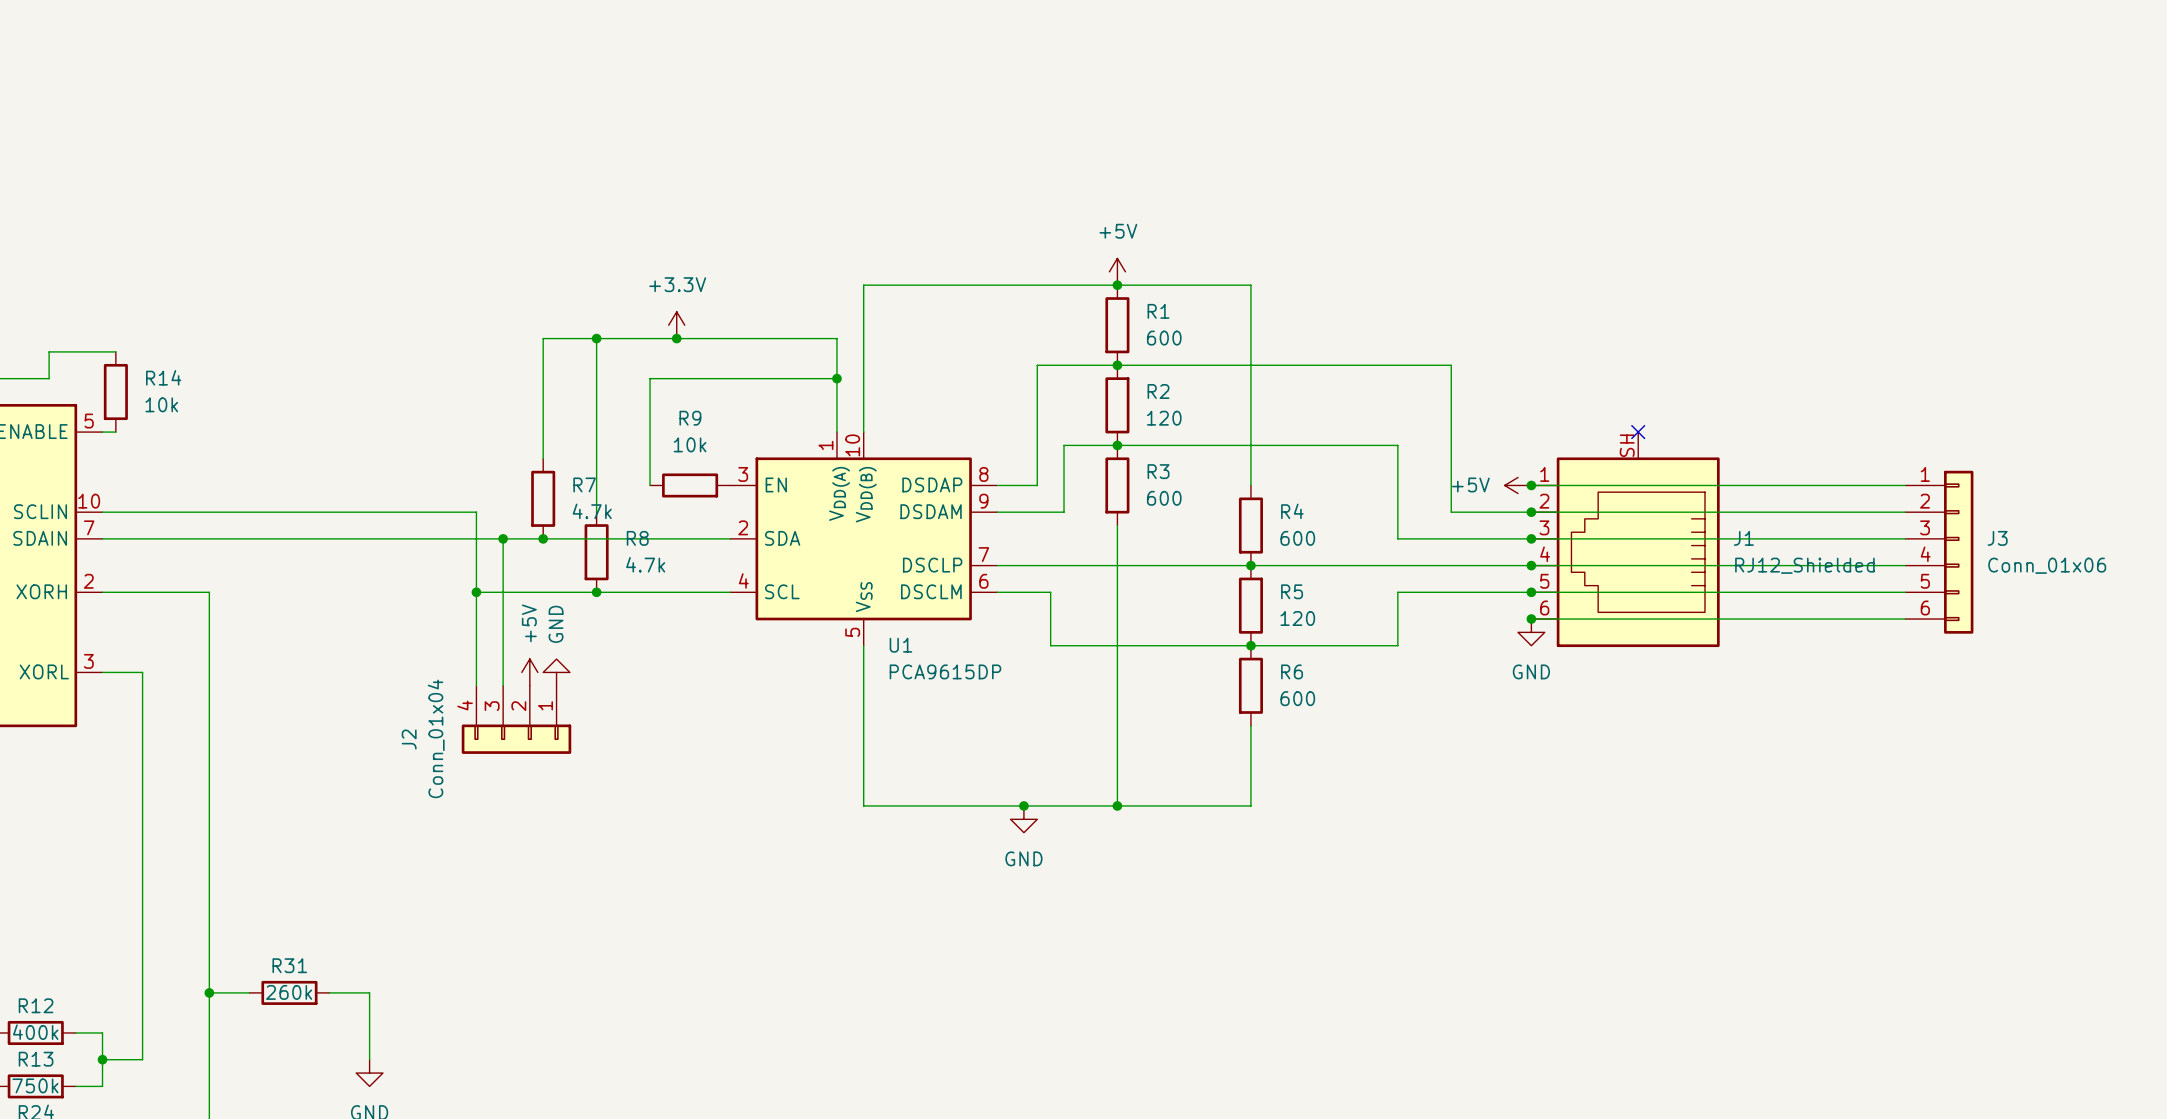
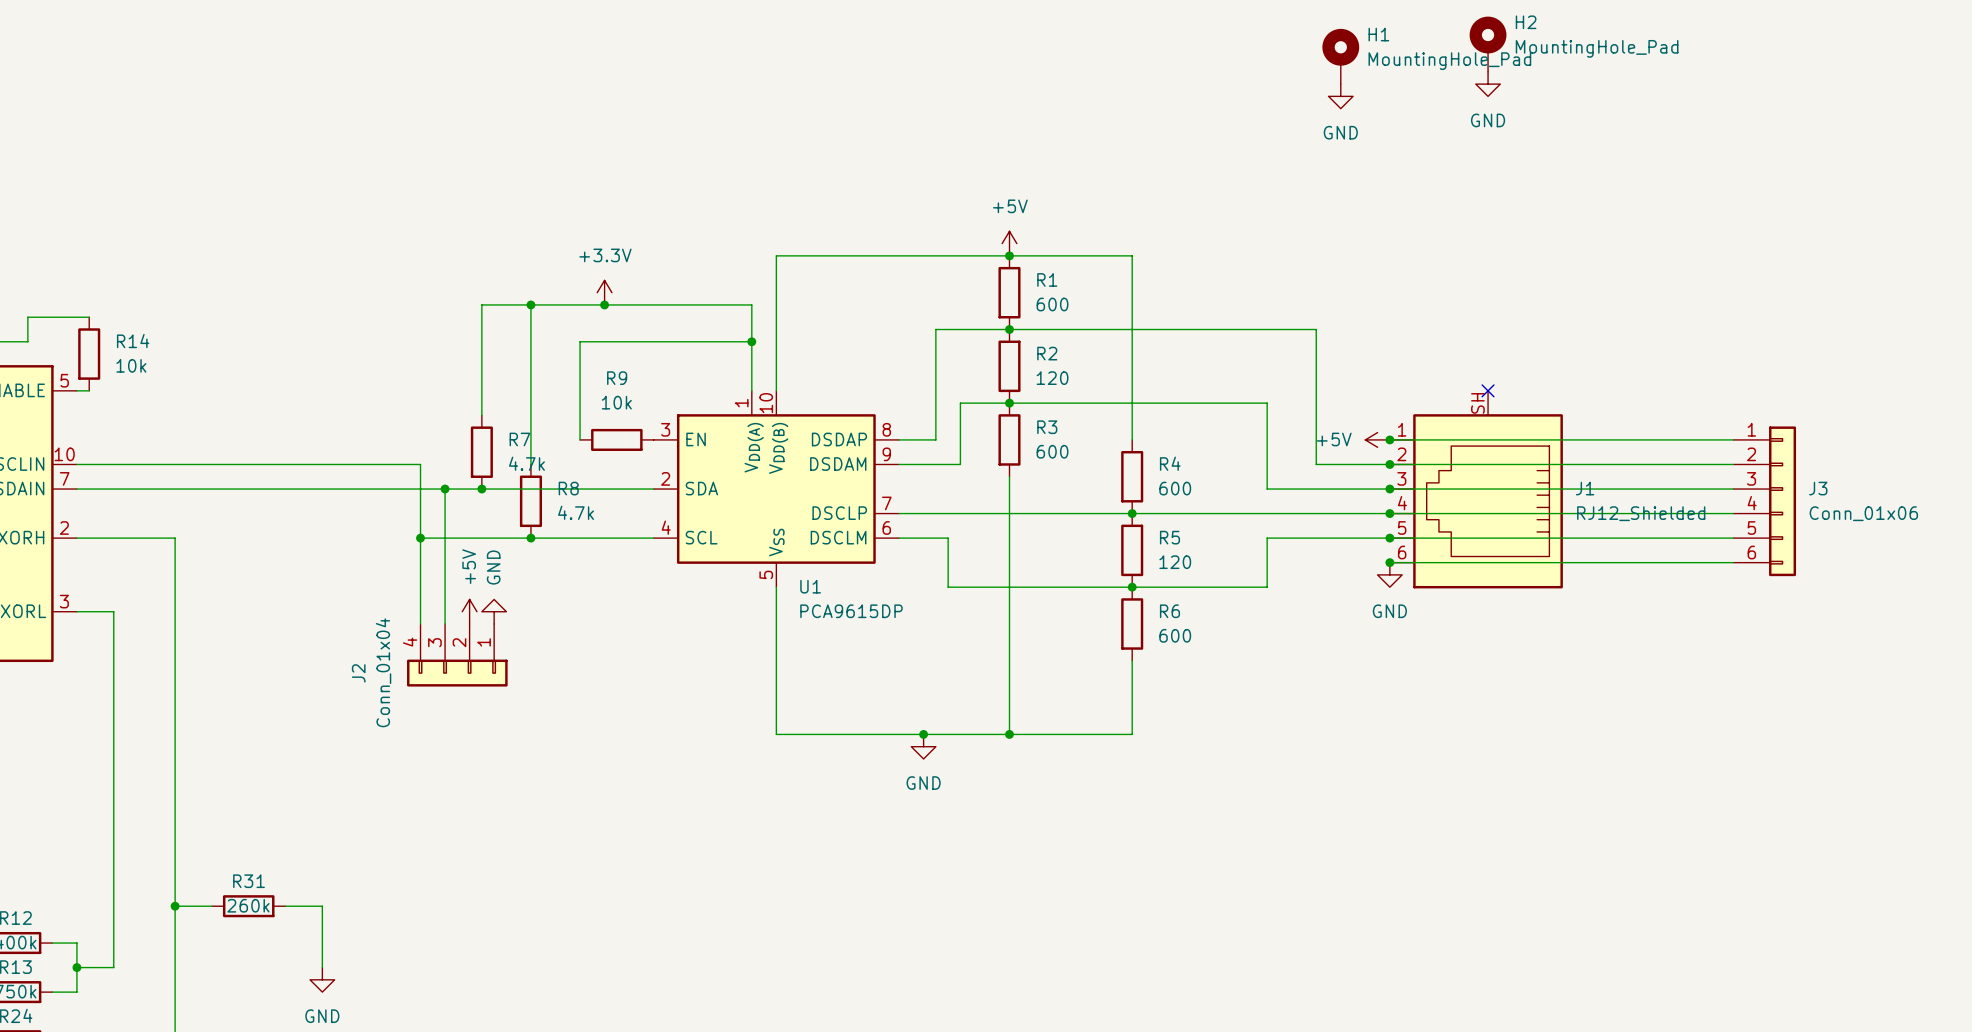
H2: none -> MountingHole_Pad (1488, 44)
H1: none -> MountingHole_Pad (1340, 56)
power symbol: none -> GND (1488, 84)
power symbol: none -> GND (1340, 96)

